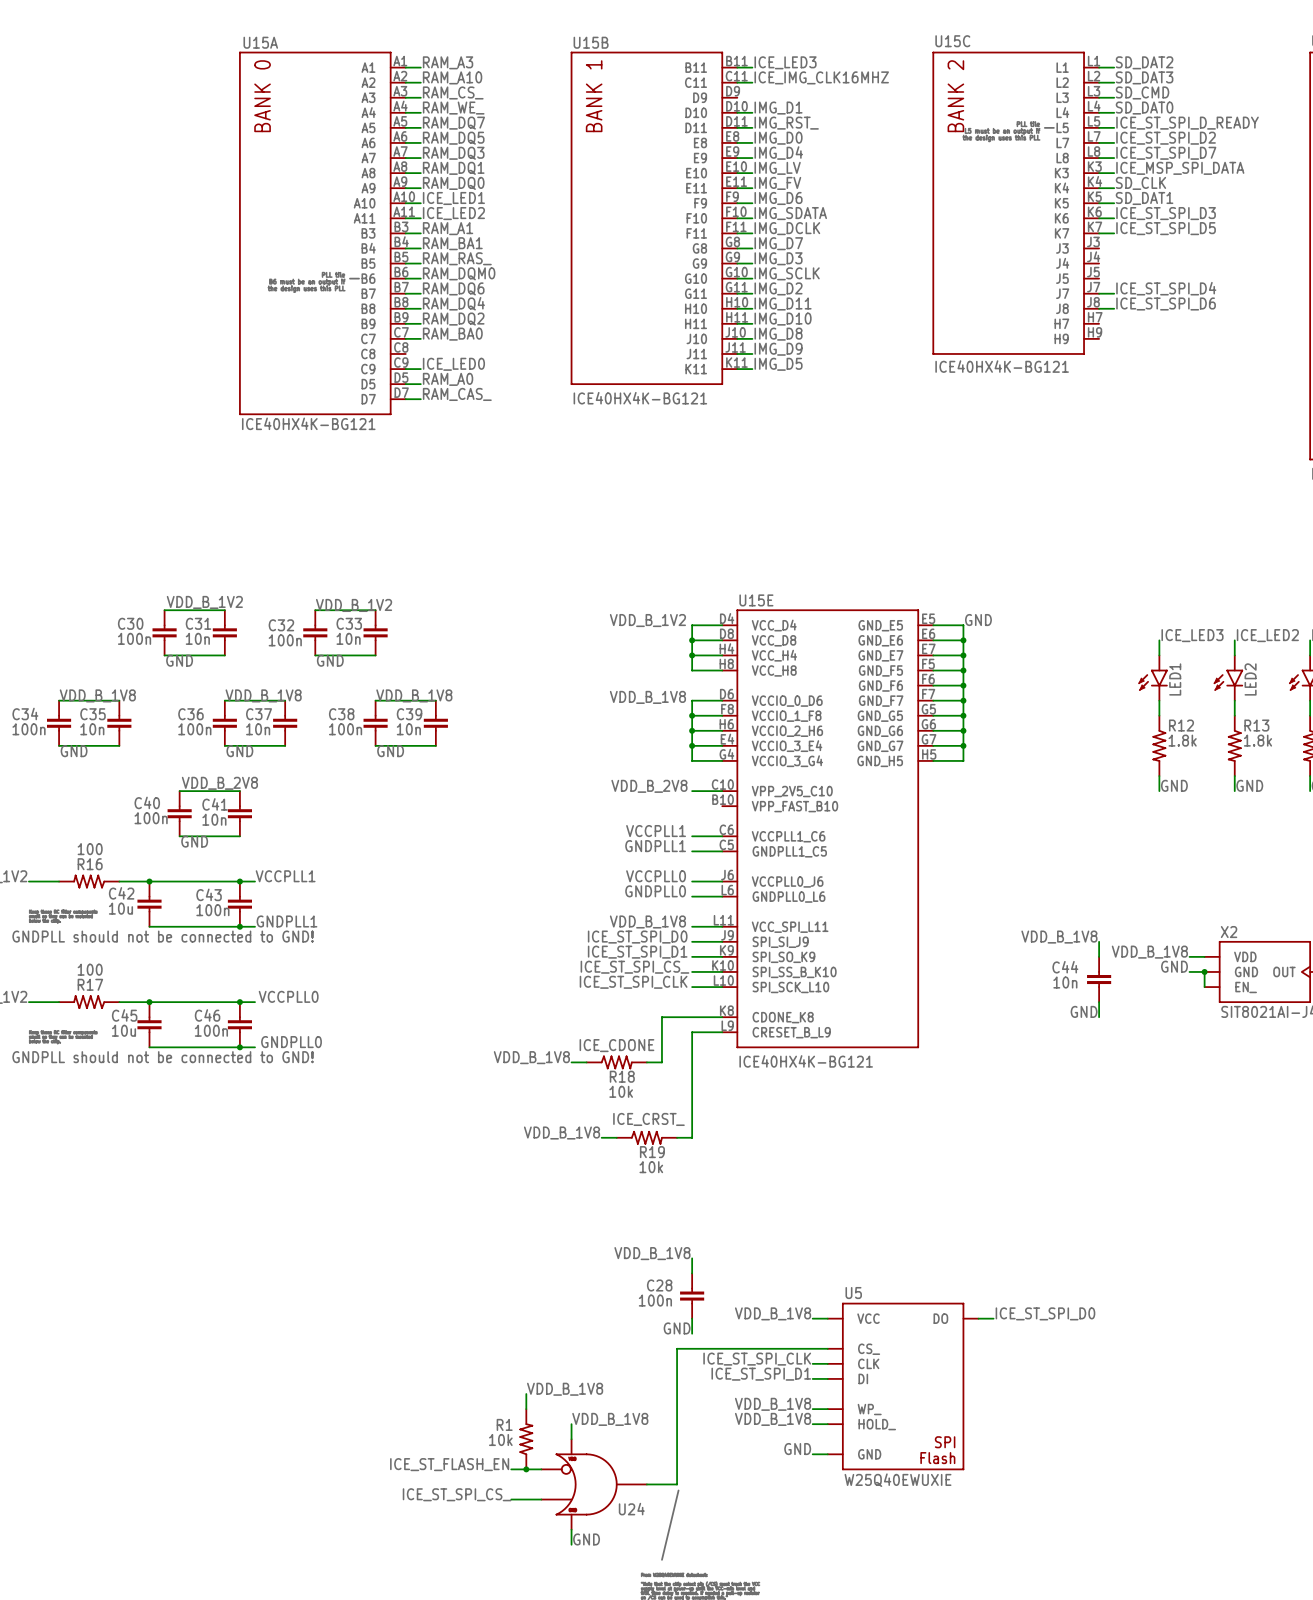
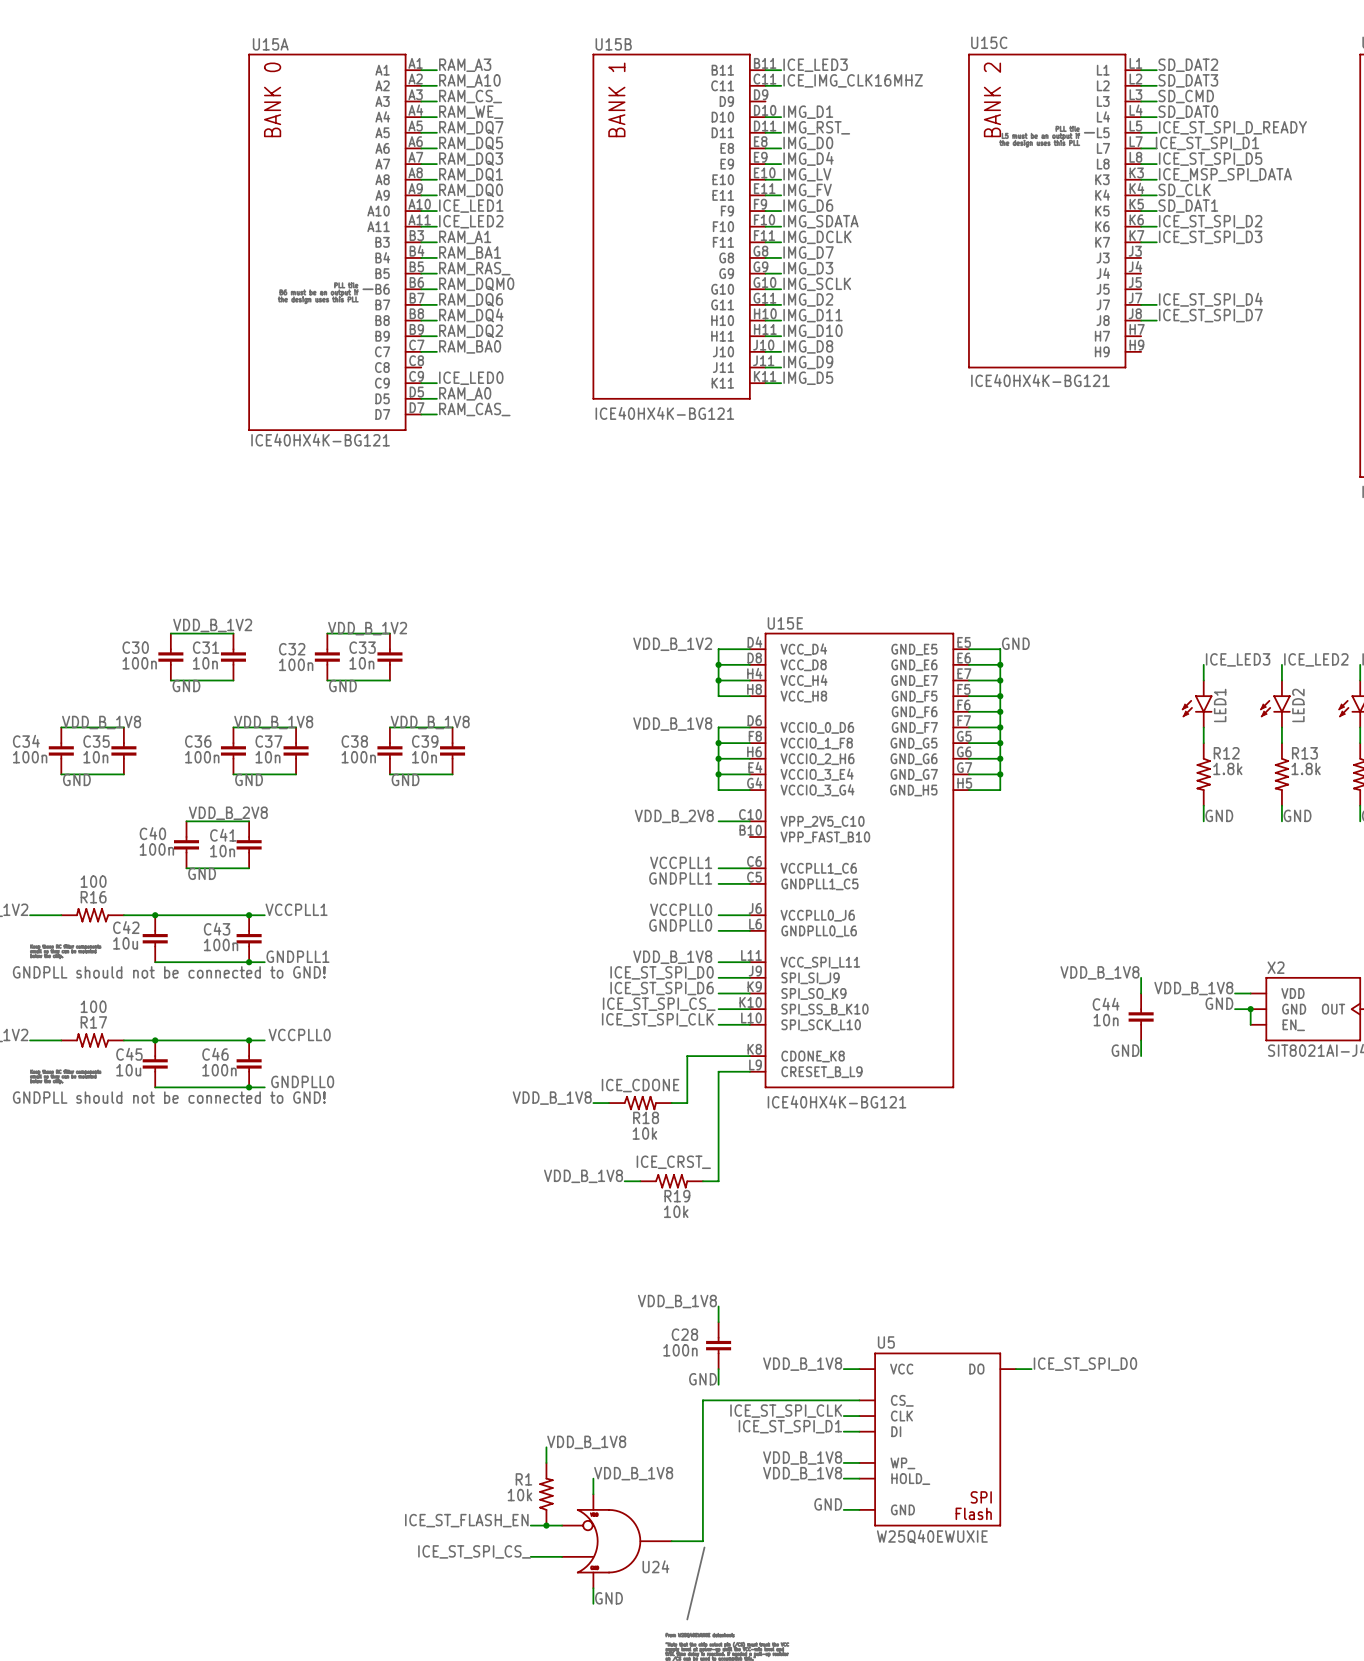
label: ICE_ST_SPI_D2 (1166, 138) -> ICE_ST_SPI_D1 (1207, 143)
label: ICE_ST_SPI_D7 (1166, 153) -> ICE_ST_SPI_D5 (1210, 159)
label: ICE_ST_SPI_D3 (1166, 213) -> ICE_ST_SPI_D2 (1210, 221)
label: ICE_ST_SPI_D5 (1166, 228) -> ICE_ST_SPI_D3 (1210, 237)
label: ICE_ST_SPI_D6 (1166, 303) -> ICE_ST_SPI_D7 (1210, 315)
label: ICE_ST_SPI_D1 (637, 952) -> ICE_ST_SPI_D6 (662, 988)

